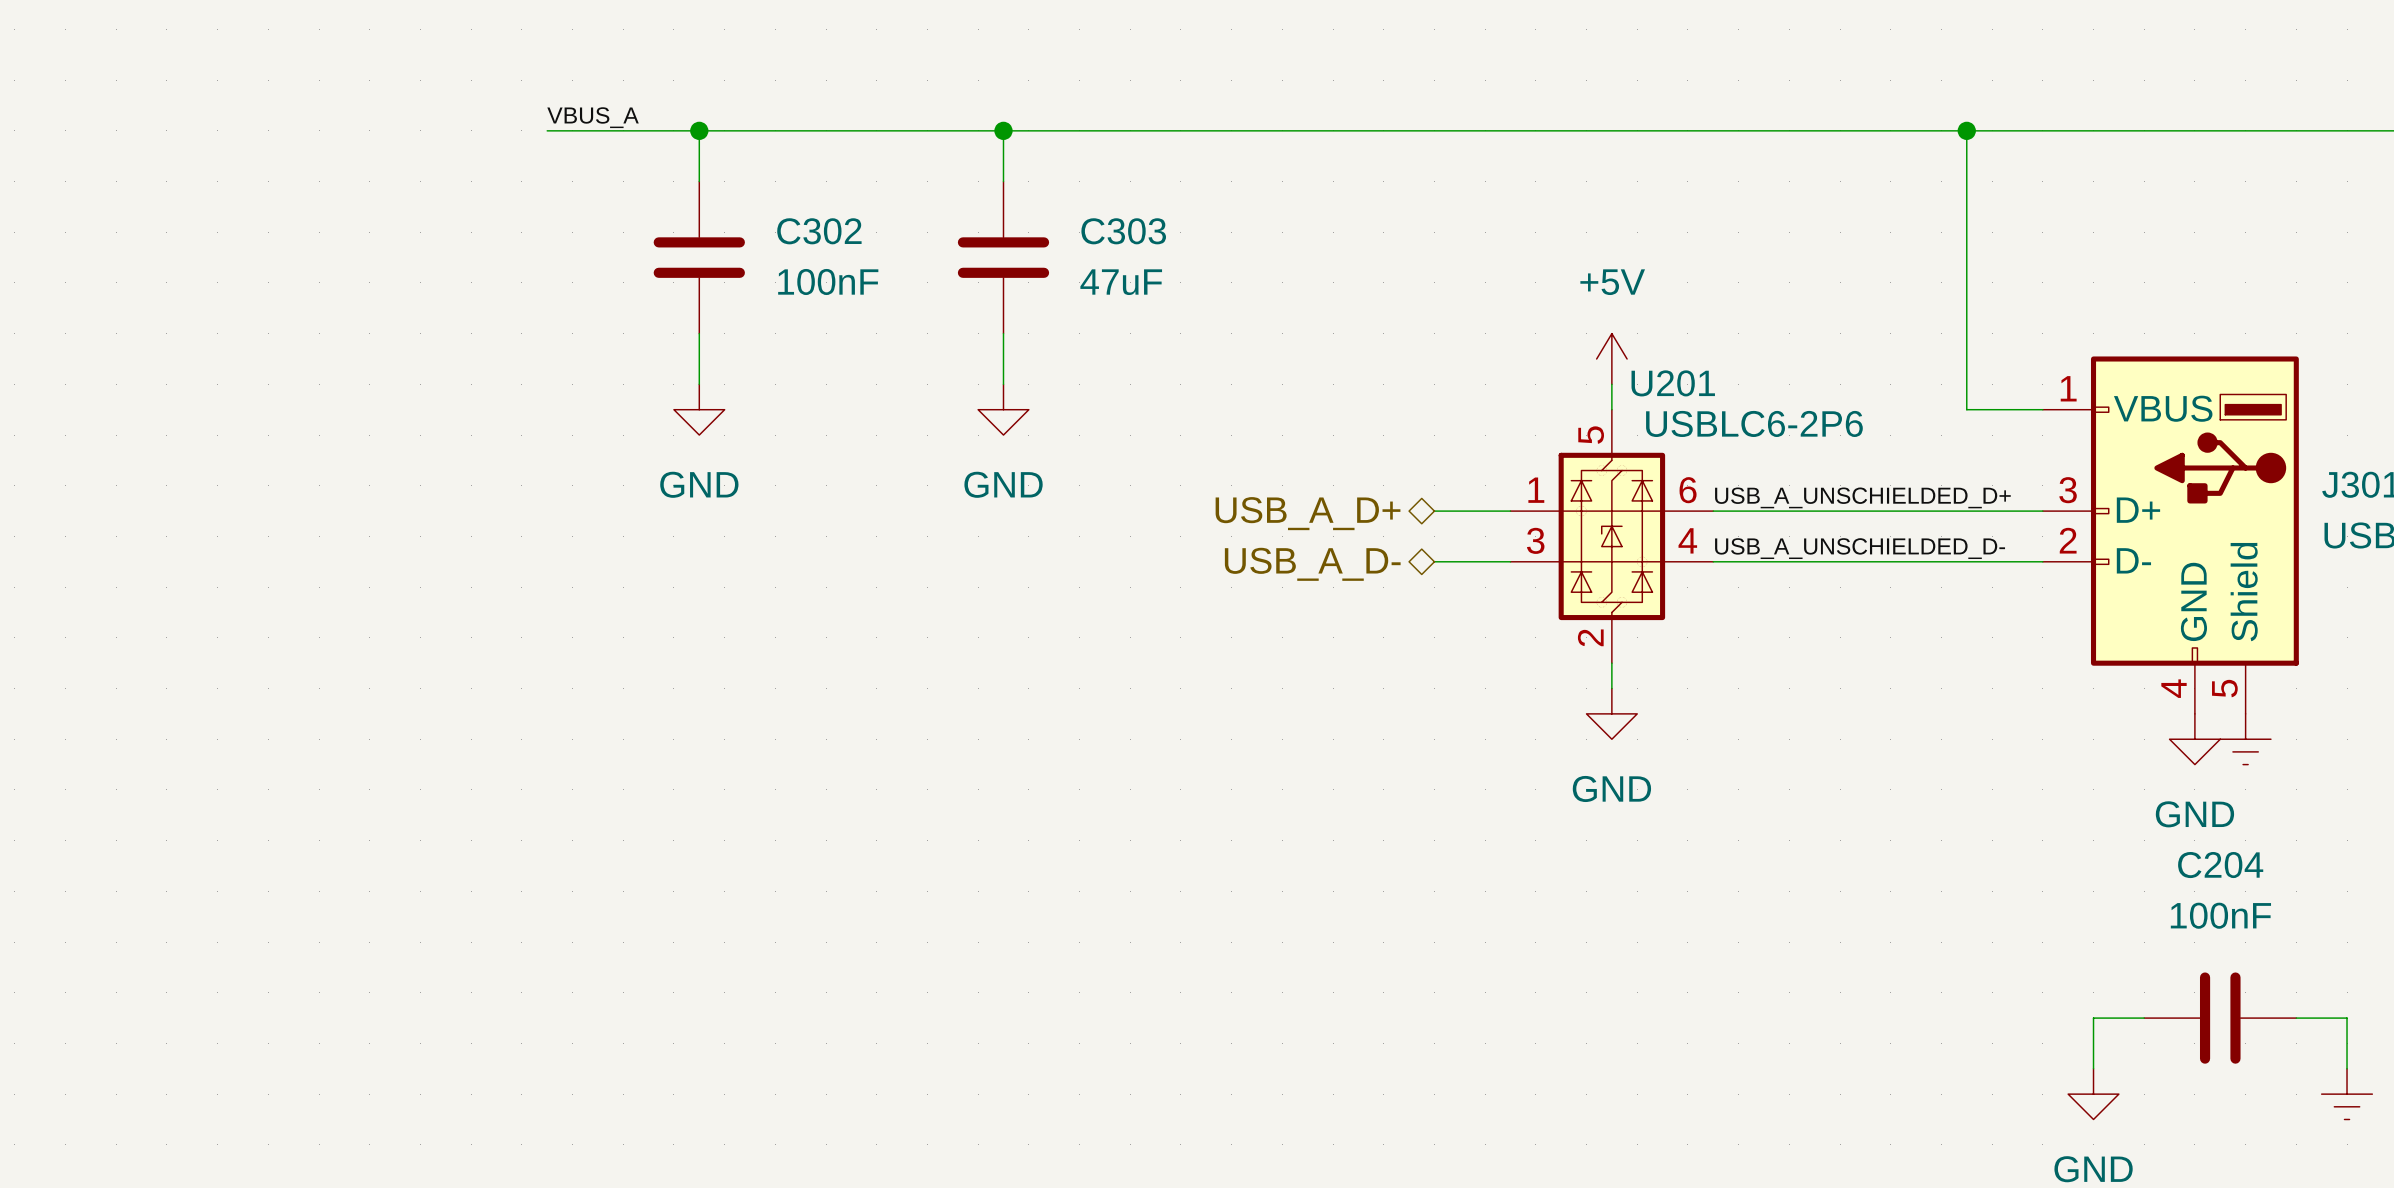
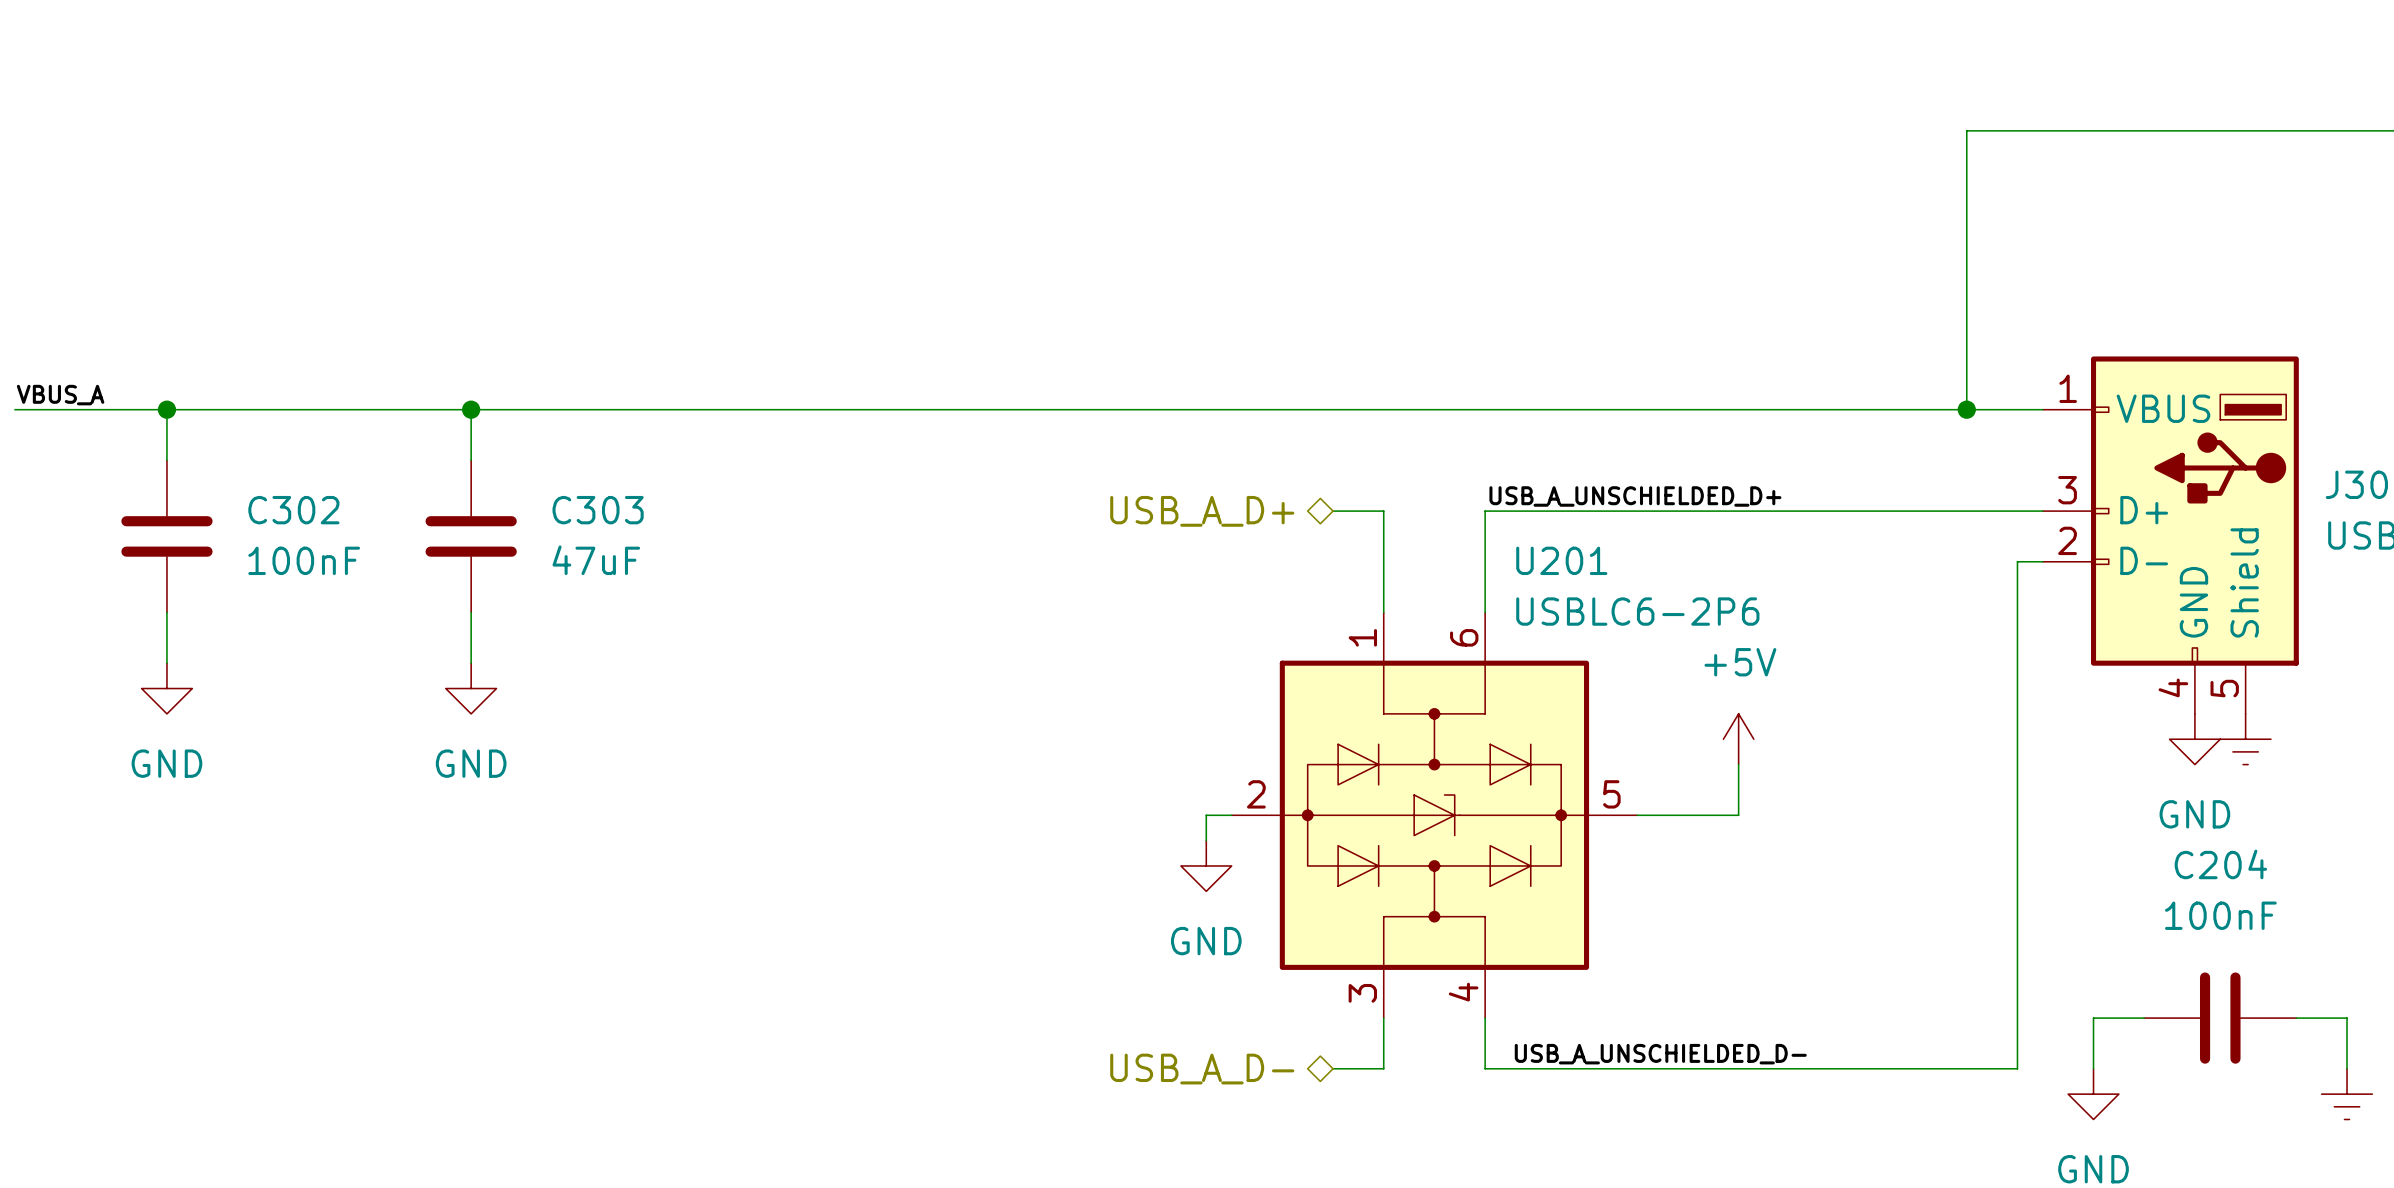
label: VBUS_A (593, 117) -> none
wire: (547, 130) (1966, 130) -> none
wire: (699, 130) (699, 181) -> (471, 409) (471, 460)
junction: (699, 130) -> none
wire: (1003, 130) (1003, 181) -> none
junction: (1003, 130) -> none
junction: (1966, 130) -> none
C302 position: (699, 257) -> (166, 536)
C303 position: (1003, 257) -> (471, 536)
wire: (699, 333) (699, 384) -> (471, 612) (471, 663)
wire: (1003, 333) (1003, 384) -> none
power symbol position: +5V (1611, 359) -> +5V (1738, 739)
U201 name position: U201 (1673, 383) -> U201 (1561, 560)
wire: (1611, 384) (1611, 409) -> none
label: none -> VBUS_A (60, 395)
wire: none -> (14, 409) (1966, 409)
wire: none -> (166, 409) (166, 460)
junction: none -> (166, 409)
junction: none -> (471, 409)
power symbol: GND (699, 409) -> none
power symbol: GND (1003, 409) -> none
U201 symbol: [1510, 409, 1714, 664] -> [1231, 612, 1638, 1019]
junction: none -> (1966, 409)
U201 value position: USBLC6-2P6 (1754, 423) -> USBLC6-2P6 (1637, 611)
label position: USB_A_UNSCHIELDED_D+ (1862, 497) -> USB_A_UNSCHIELDED_D+ (1635, 496)
wire: none -> (1333, 511) (1383, 511) (1383, 612)
wire: (1434, 511) (1485, 511) -> (1485, 612) (1485, 511)
hierarchical label position: USB_A_D+ (1308, 513) -> USB_A_D+ (1202, 511)
label: USB_A_UNSCHIELDED_D- (1860, 548) -> none
wire: (1434, 561) (1510, 561) -> none
wire: (1713, 561) (2017, 561) -> (1485, 1018) (1485, 1068) (2017, 1068) (2017, 561)
hierarchical label: USB_A_D- (1312, 564) -> none
wire: none -> (166, 612) (166, 663)
wire: (1611, 663) (1611, 688) -> none
power symbol: none -> GND (166, 688)
power symbol: none -> GND (471, 688)
power symbol: GND (1611, 713) -> none
wire: none -> (1738, 764) (1738, 815) (1637, 815)
wire: none -> (1231, 815) (1206, 815) (1206, 840)
power symbol: none -> GND (1206, 865)
wire: none -> (1383, 1018) (1383, 1068) (1333, 1068)
label: none -> USB_A_UNSCHIELDED_D- (1660, 1054)
hierarchical label: none -> USB_A_D- (1202, 1069)

